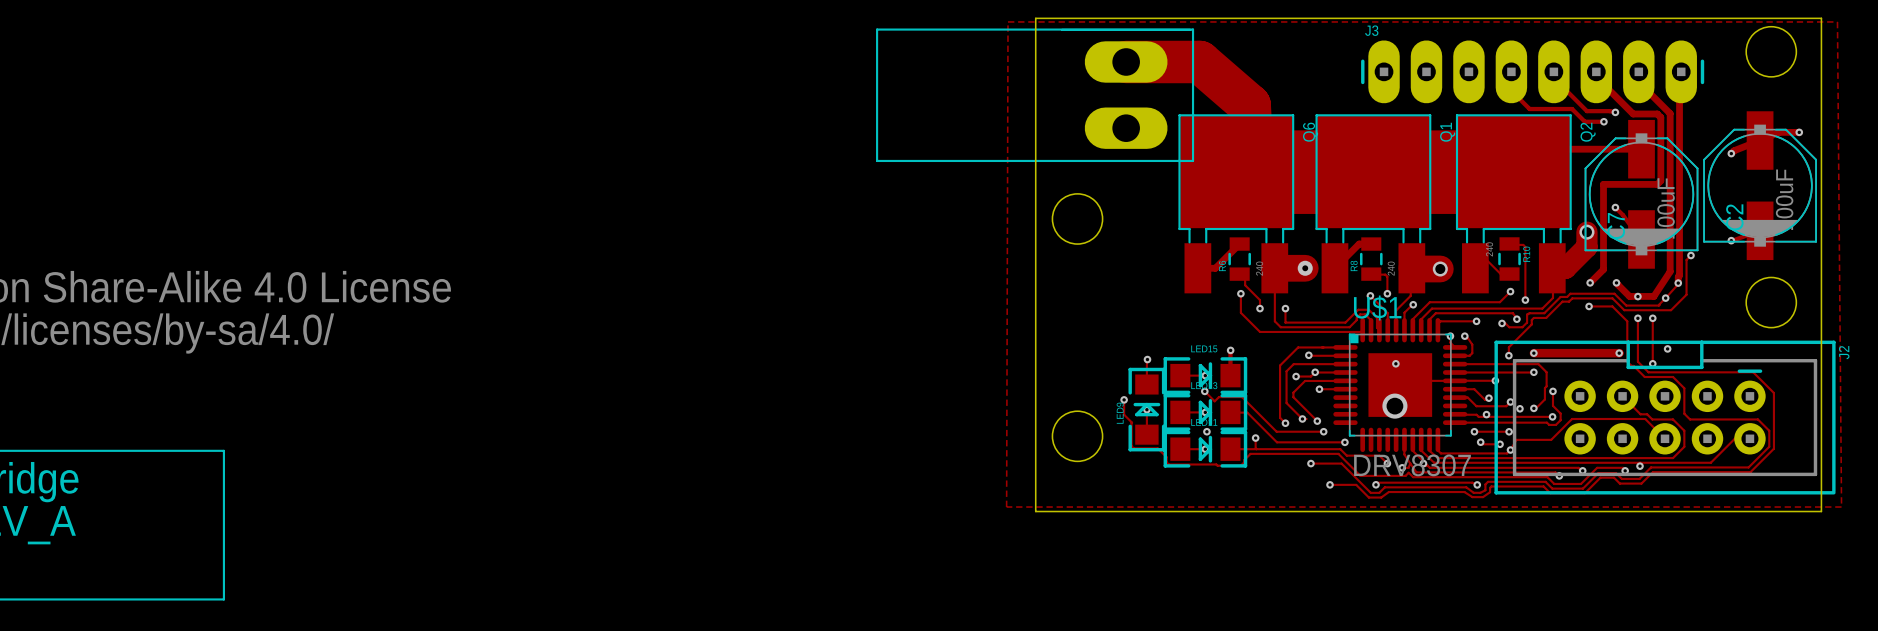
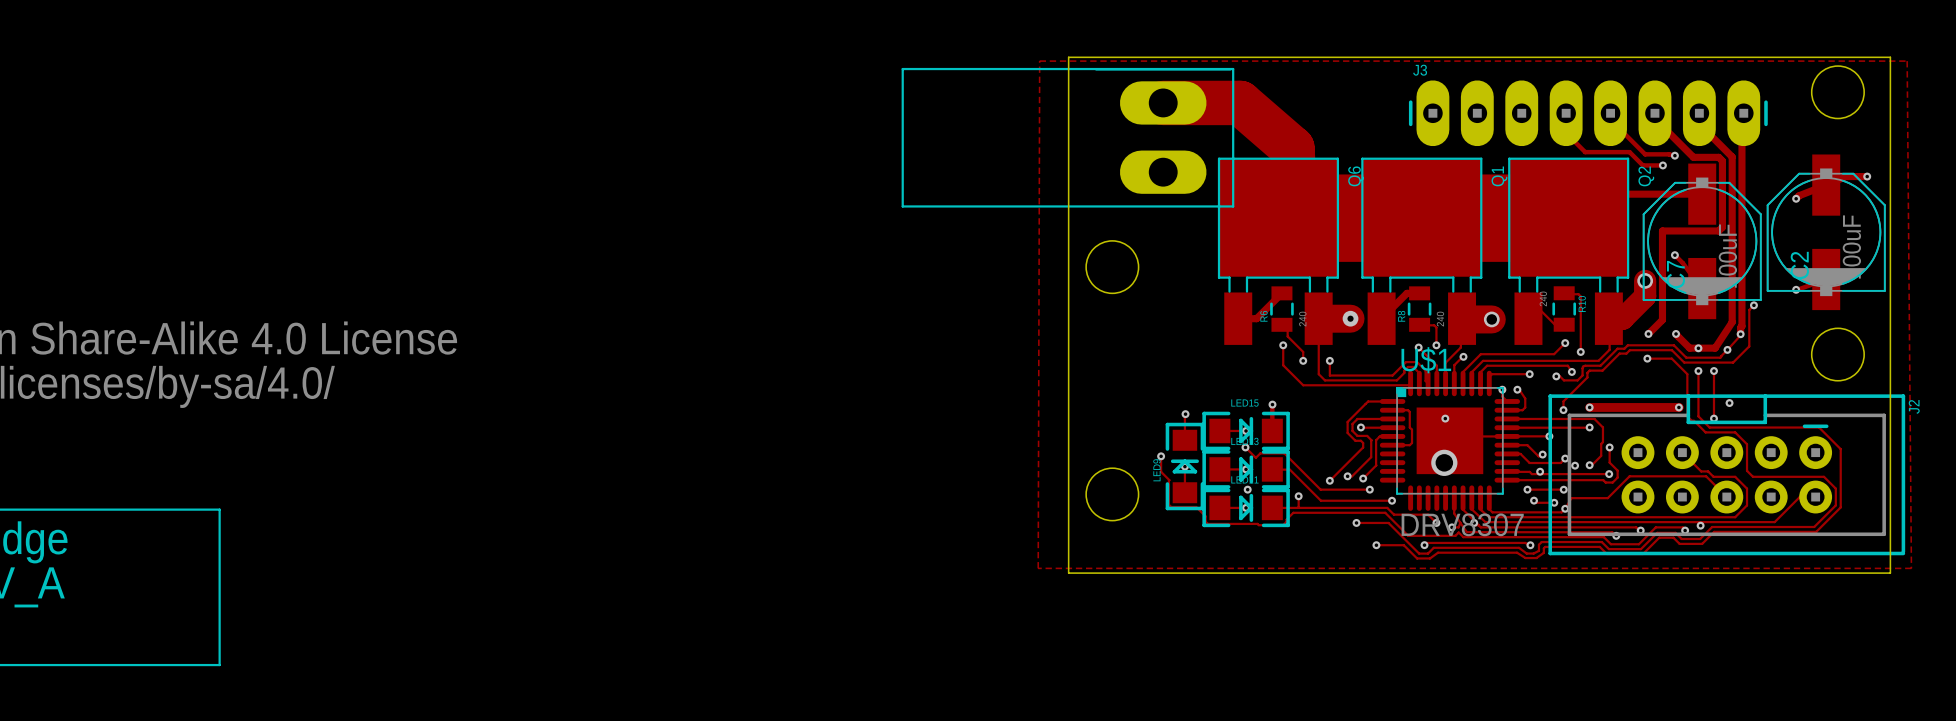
track: (1323, 347) (1298, 347) (1280, 365) (1280, 417) (1285, 423) -> (1368, 401) (1347, 421) (1347, 432) (1355, 440) (1360, 440) (1363, 447) (1329, 480)
track: (1308, 355) (1345, 355) -> none
via: (1308, 355) -> none
track: (1311, 364) (1293, 364) (1286, 371) (1286, 403) (1302, 418) -> (1357, 418) (1352, 423) (1352, 430) (1357, 435) (1367, 435) (1371, 440) (1371, 457) (1352, 476)
track: (1315, 372) (1310, 376) (1296, 376) -> none
via: (1296, 376) -> none
track: (1333, 380) (1305, 380) (1293, 392) (1293, 397) (1317, 421) -> (1379, 436) (1376, 440) (1376, 465)
track: (1319, 389) (1345, 389) -> (1392, 410) (1408, 410) (1409, 411) (1409, 427) (1412, 429) (1412, 443) (1409, 445) (1392, 445)
via: (1319, 389) -> none
track: none -> (1376, 465) (1363, 478)

